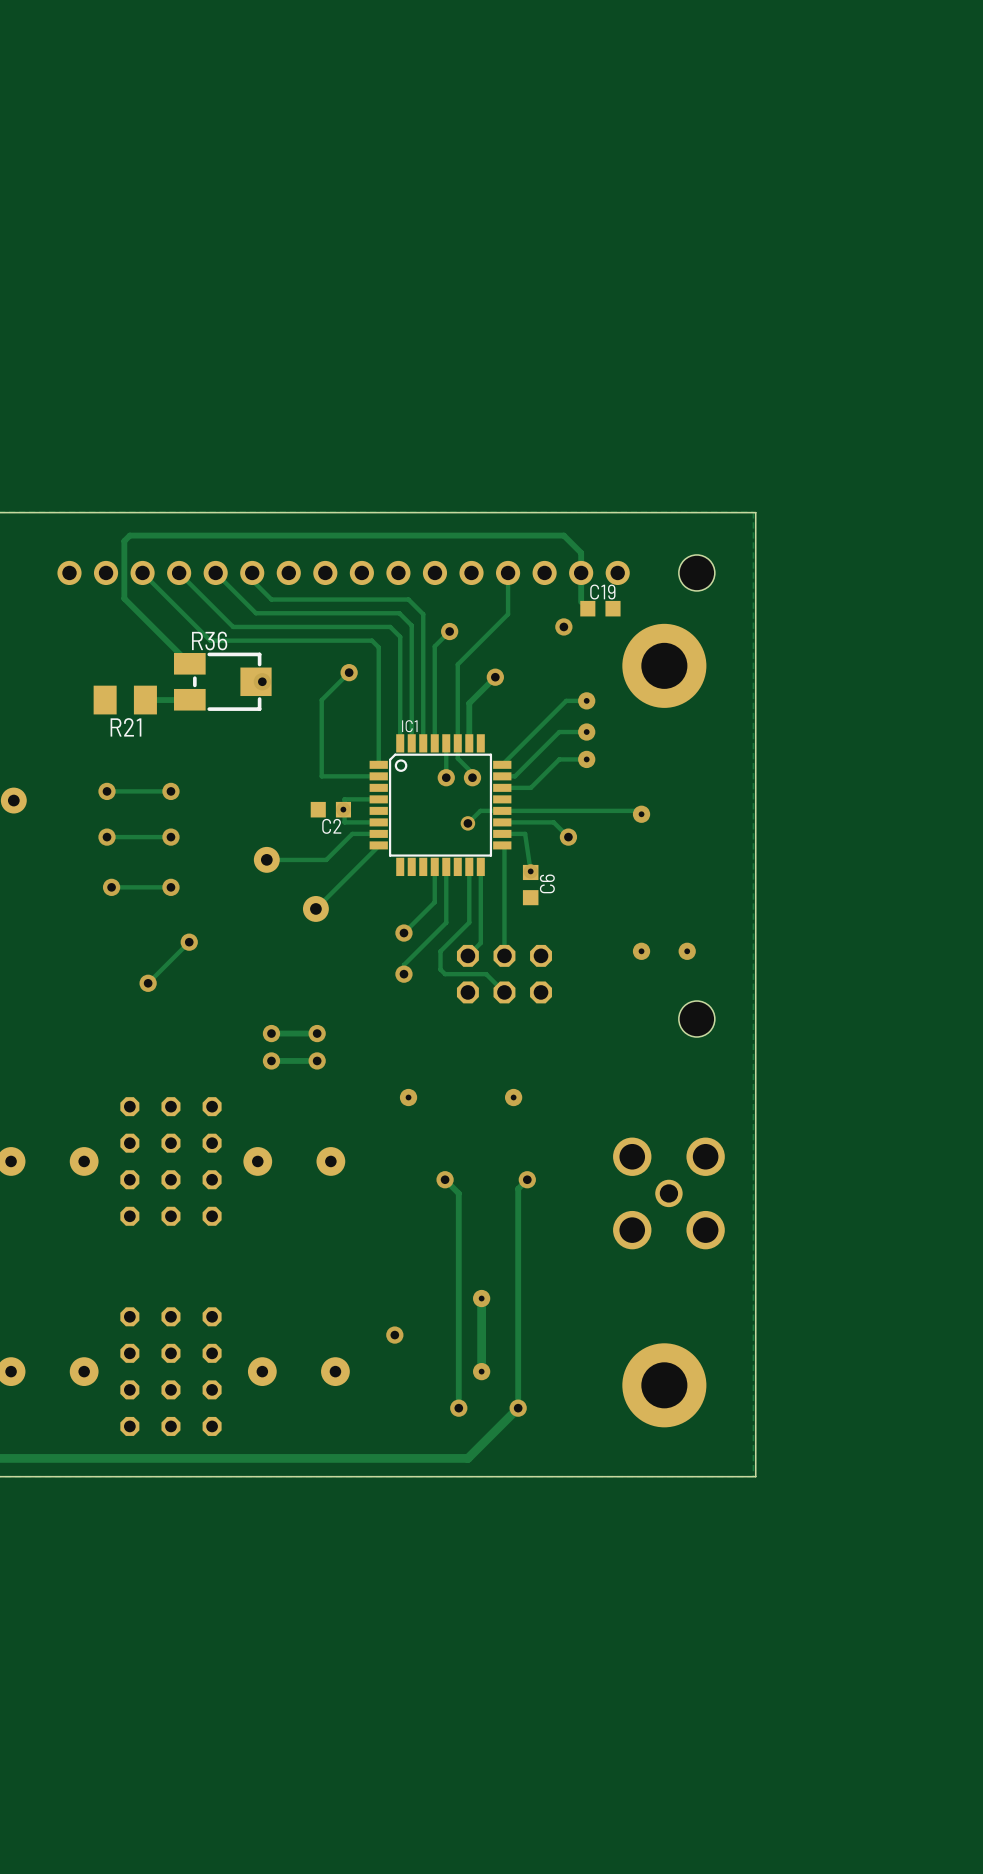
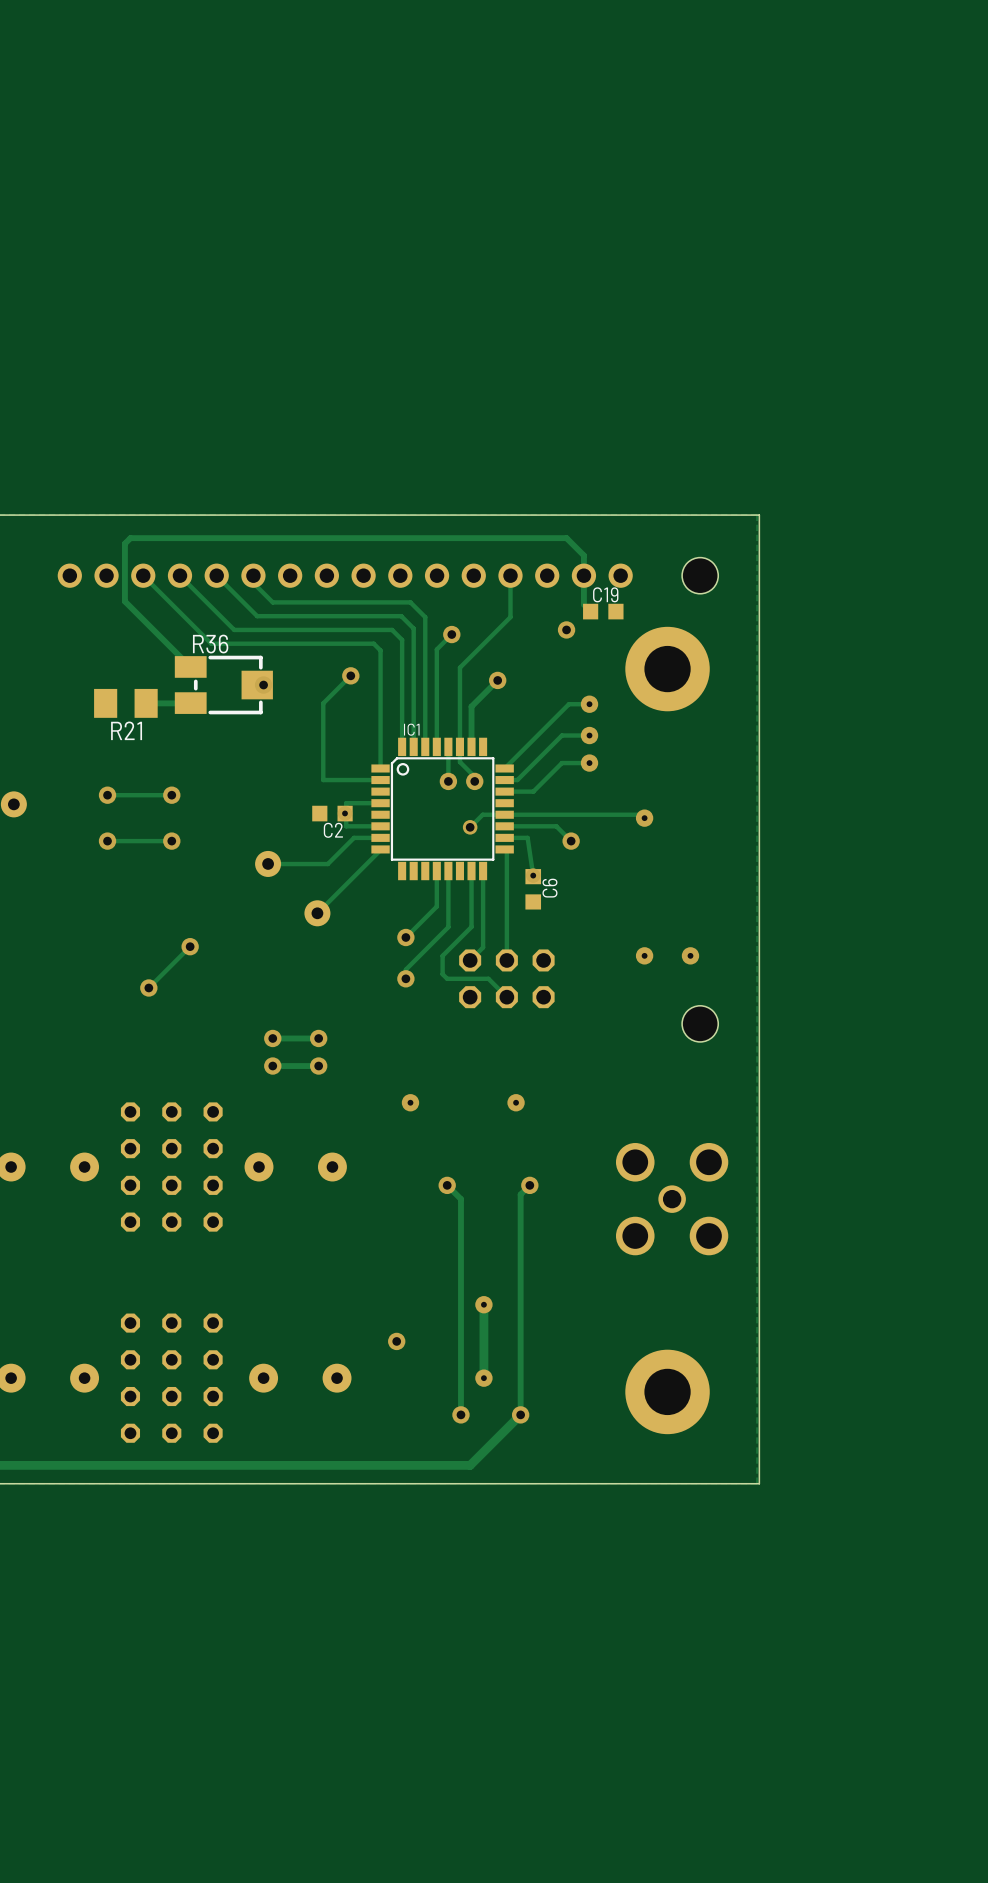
via: (111, 887) -> none
track: (170, 887) (111, 887) -> none
via: (170, 887) -> none

